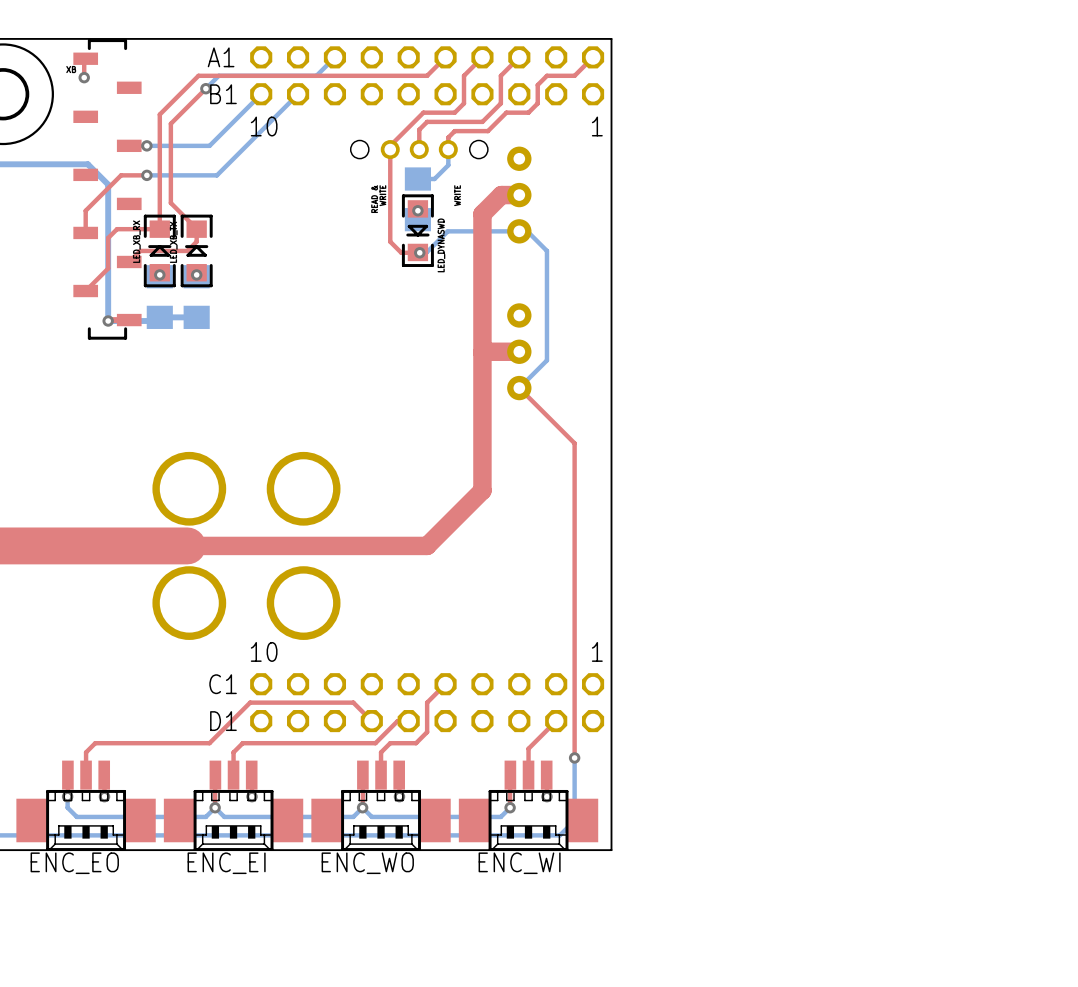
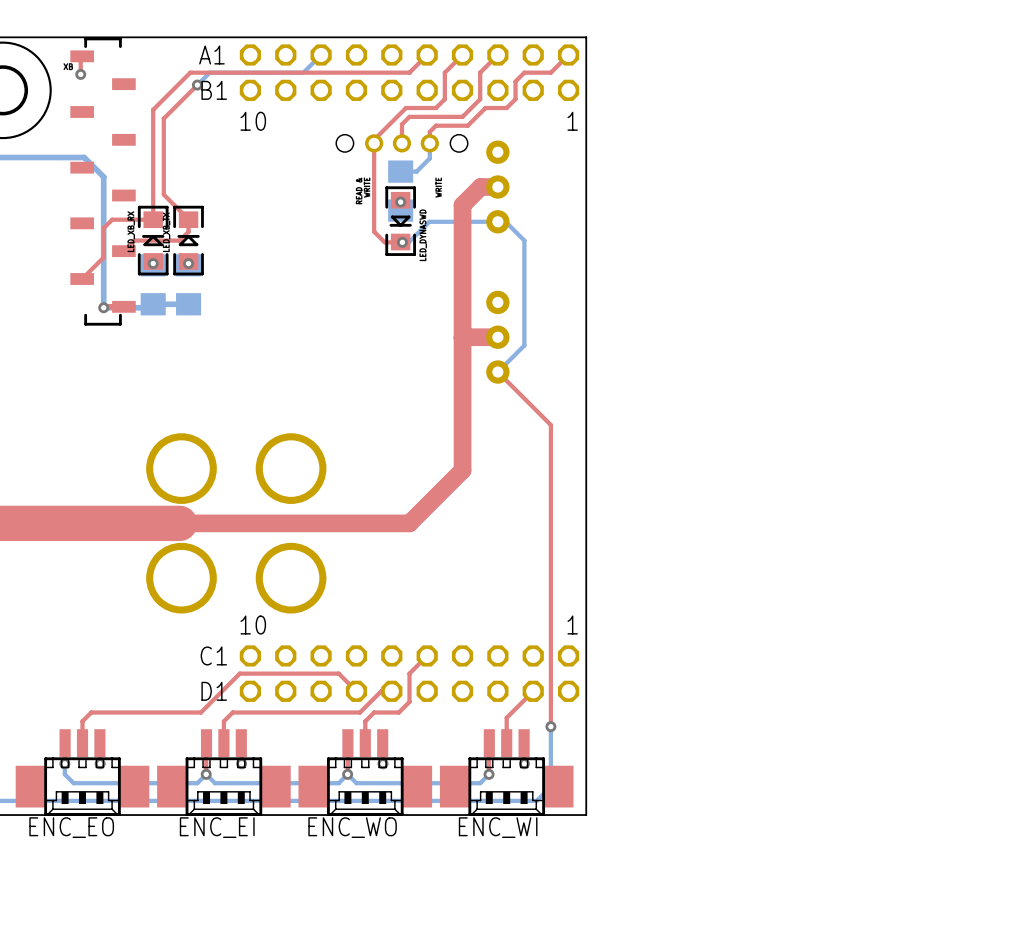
bottom track: (261, 94) (209, 145) (146, 145) -> none
bottom track: (298, 94) (216, 175) (146, 175) -> none
via: (146, 145) -> none
top track: (146, 175) (121, 175) (85, 210) (85, 232) -> none
via: (146, 175) -> none

